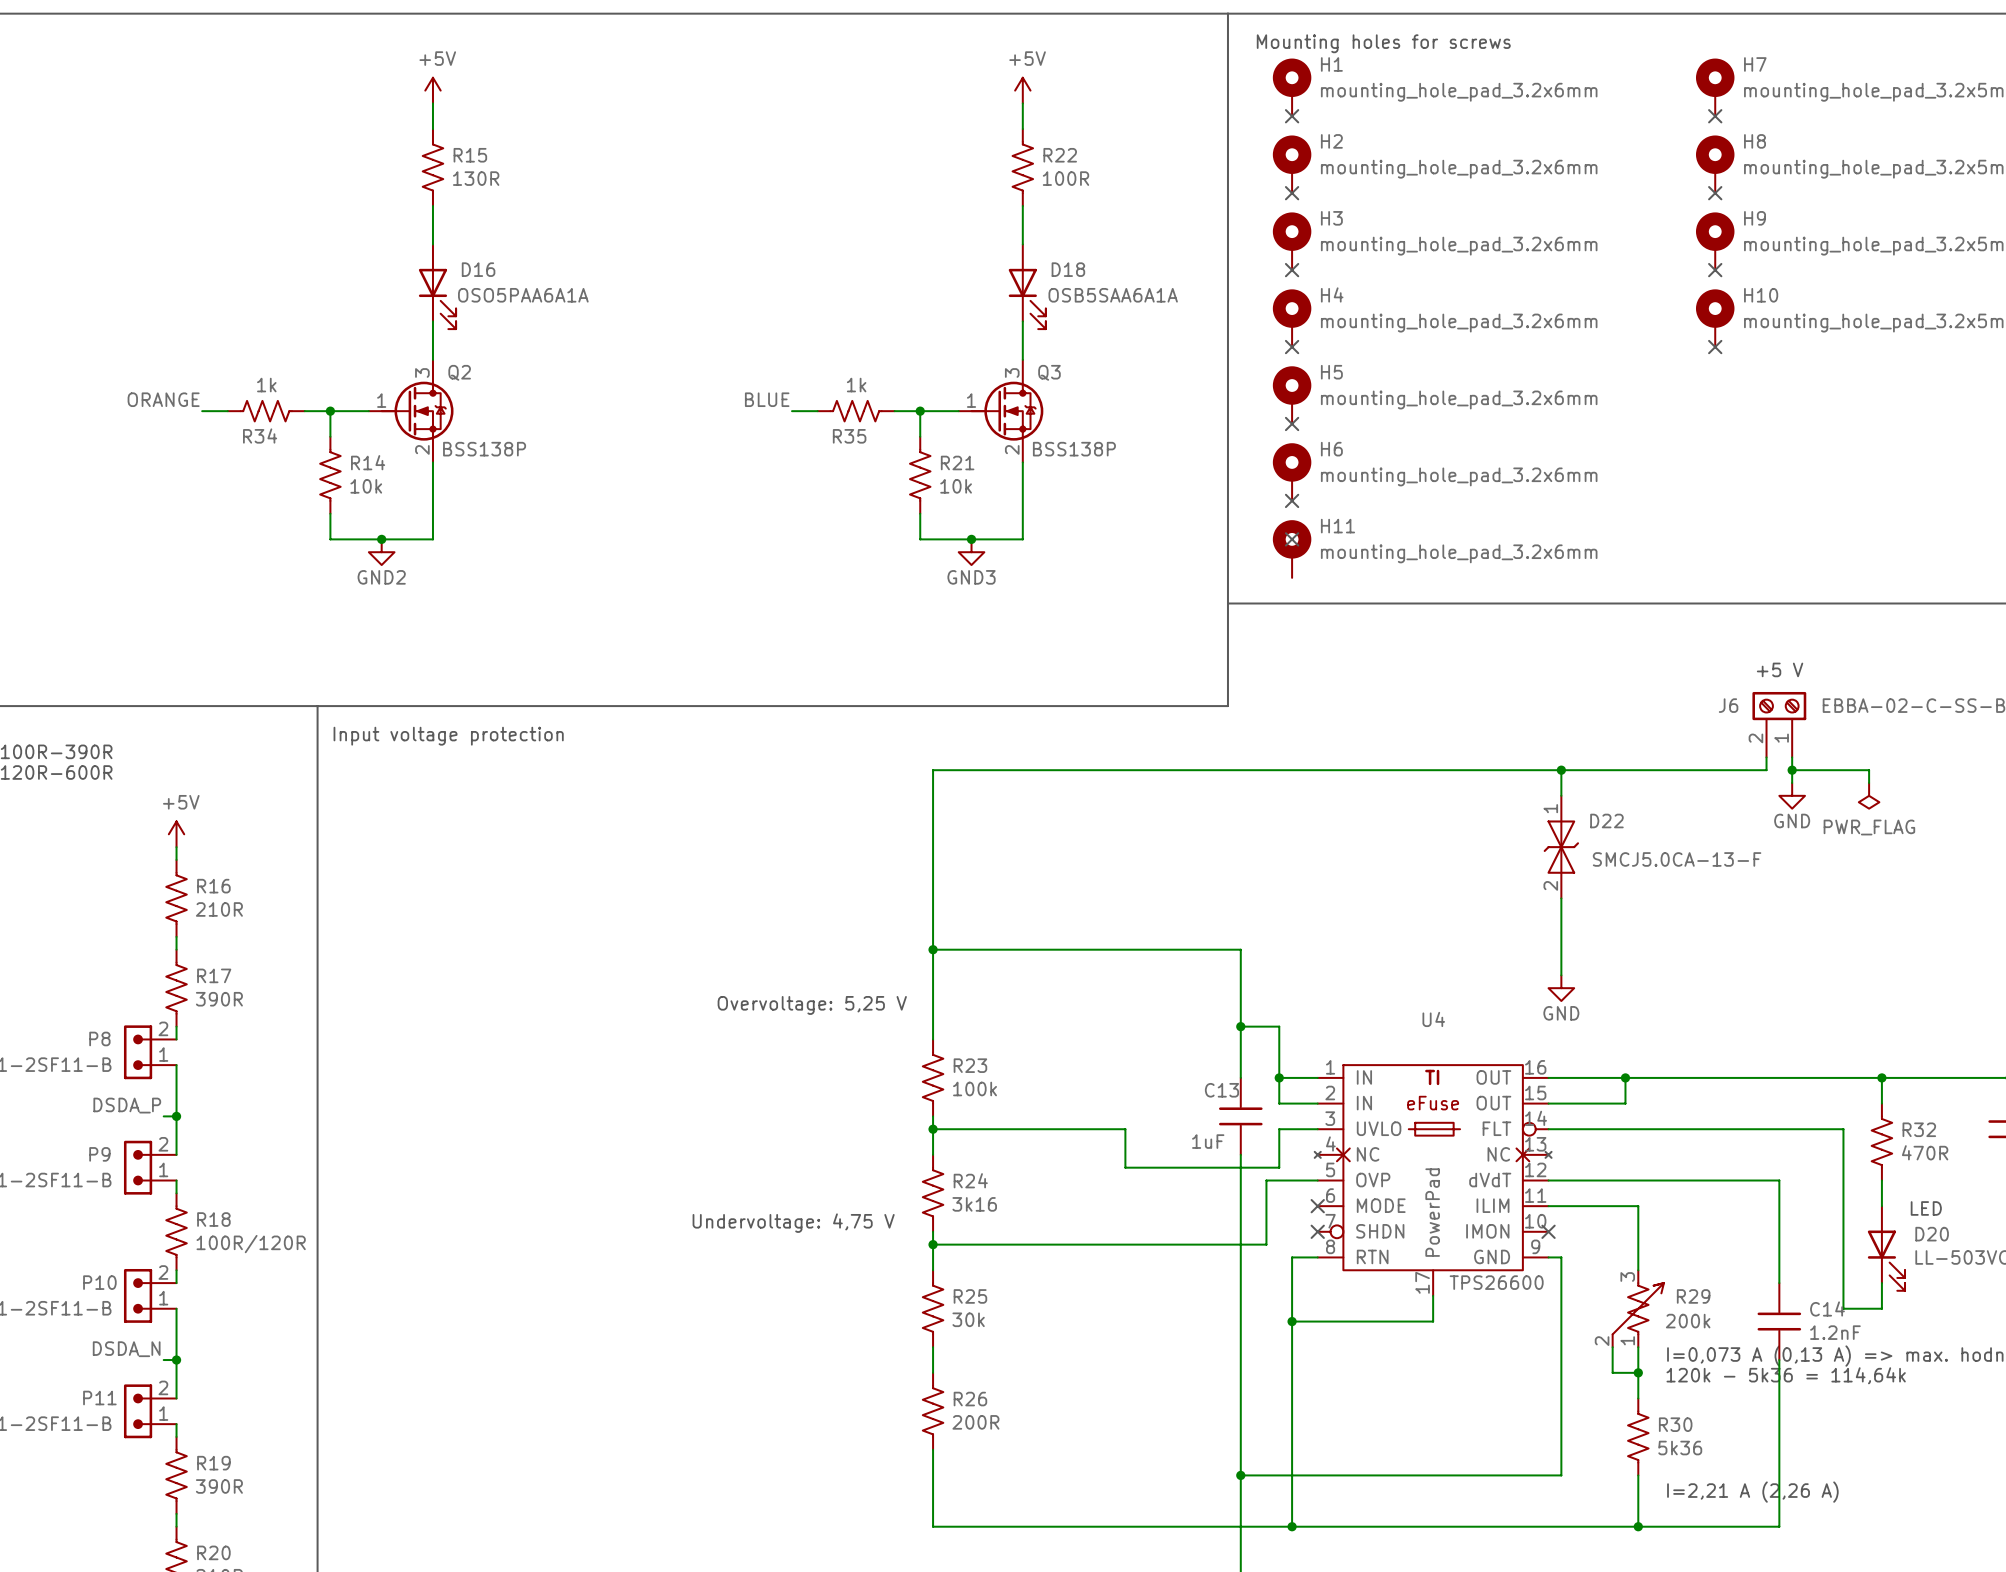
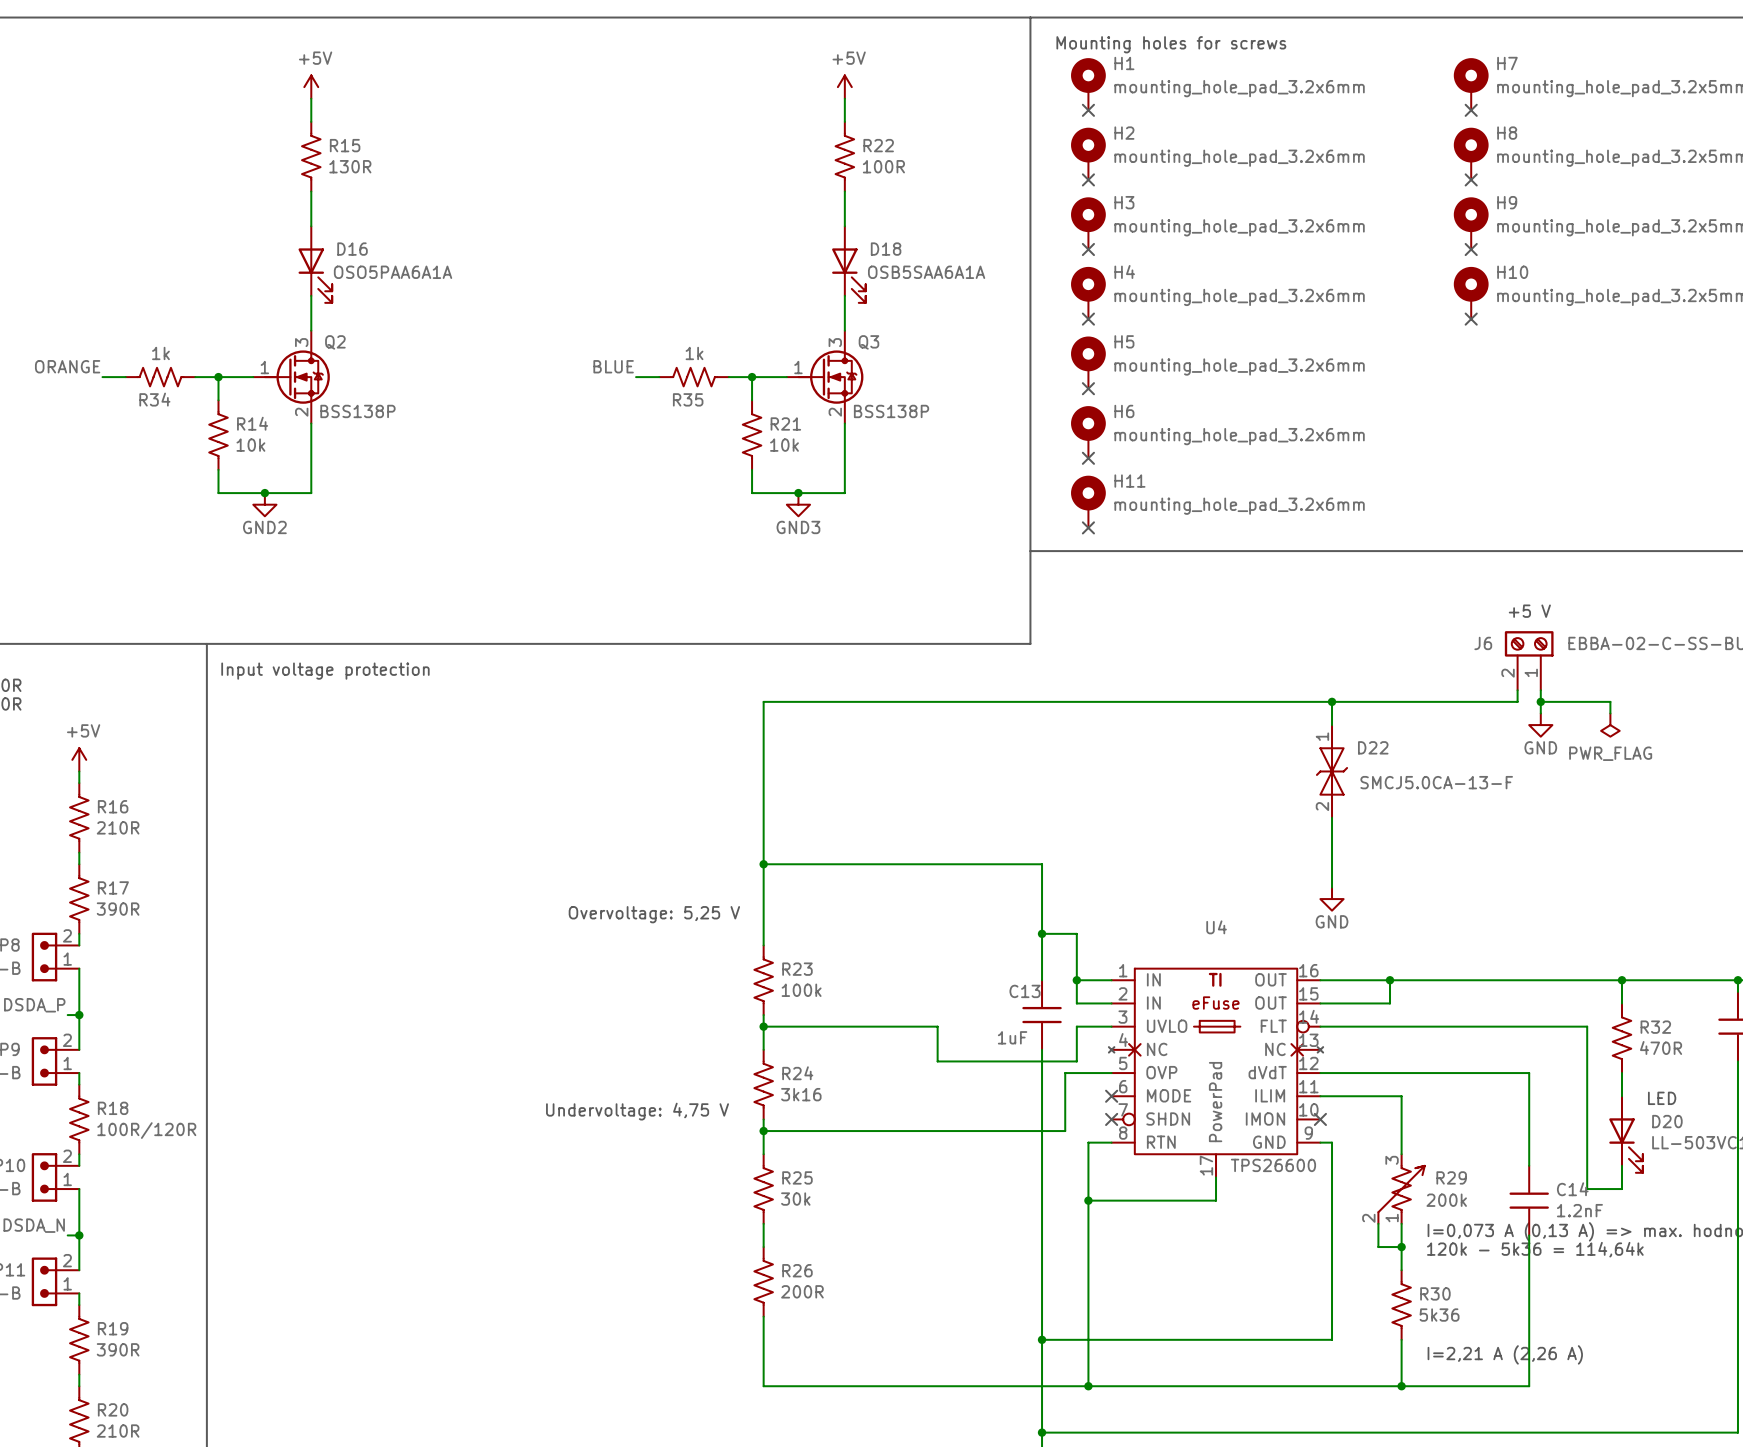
no-connect mark position: (1292, 539) -> (1088, 527)

